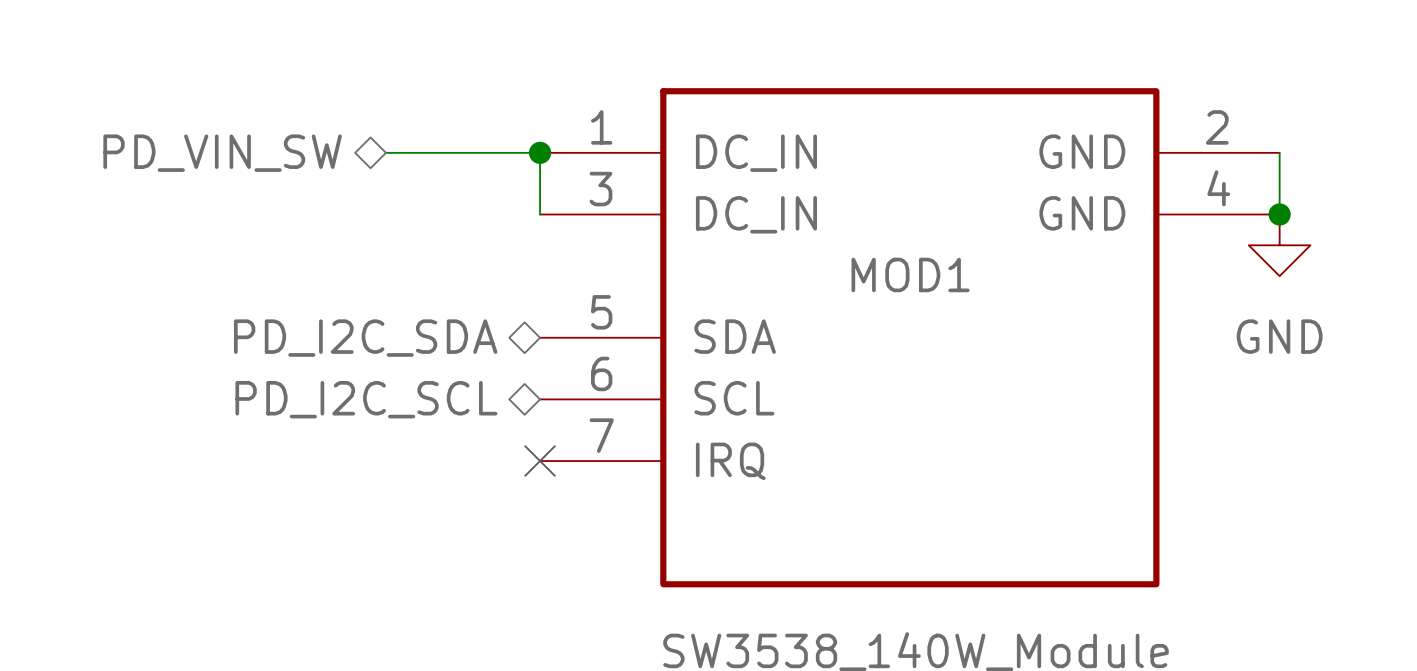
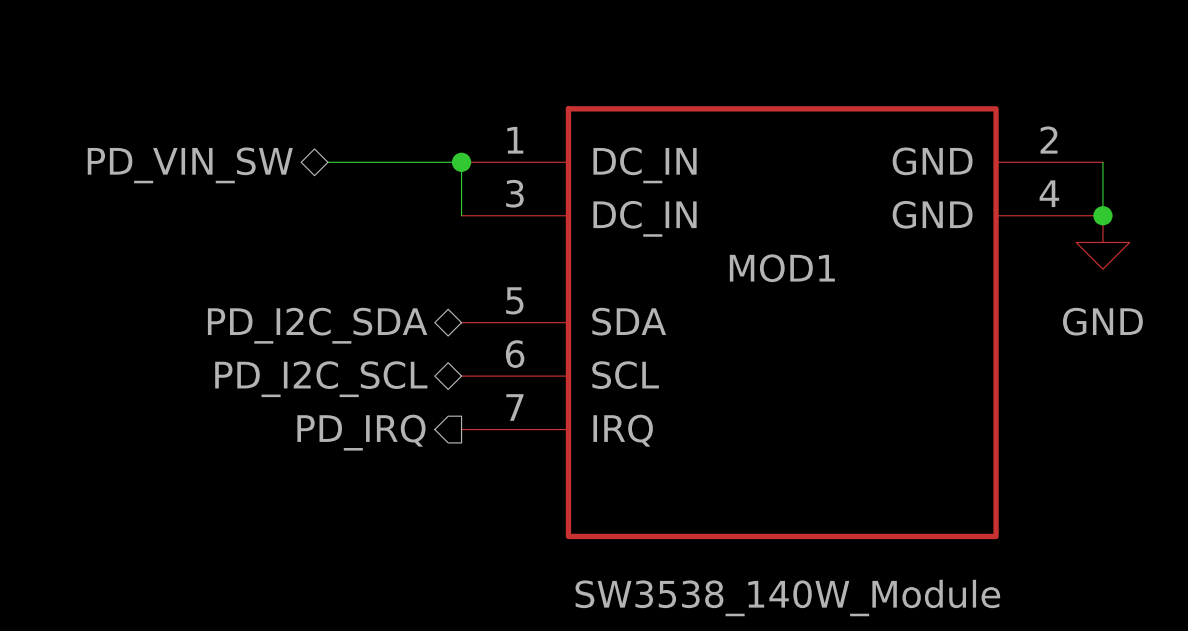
hierarchical label: none -> PD_IRQ (361, 432)
no-connect mark: (540, 461) -> none

